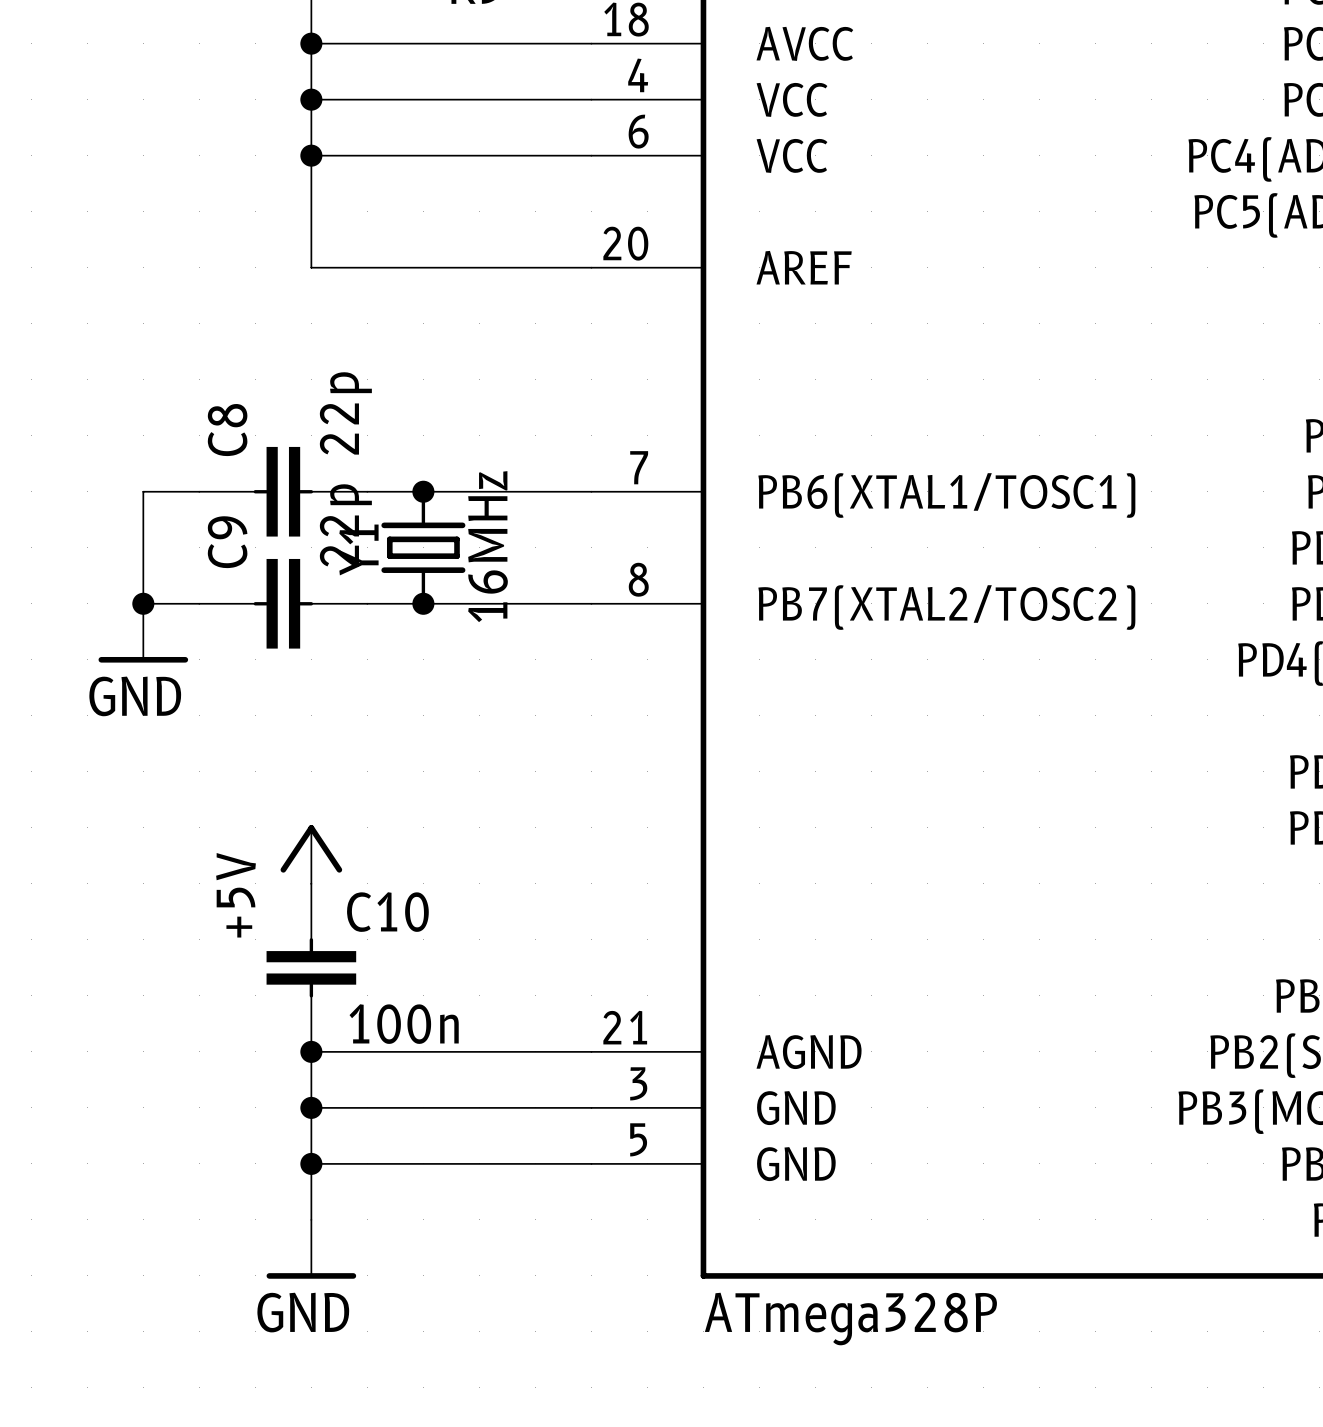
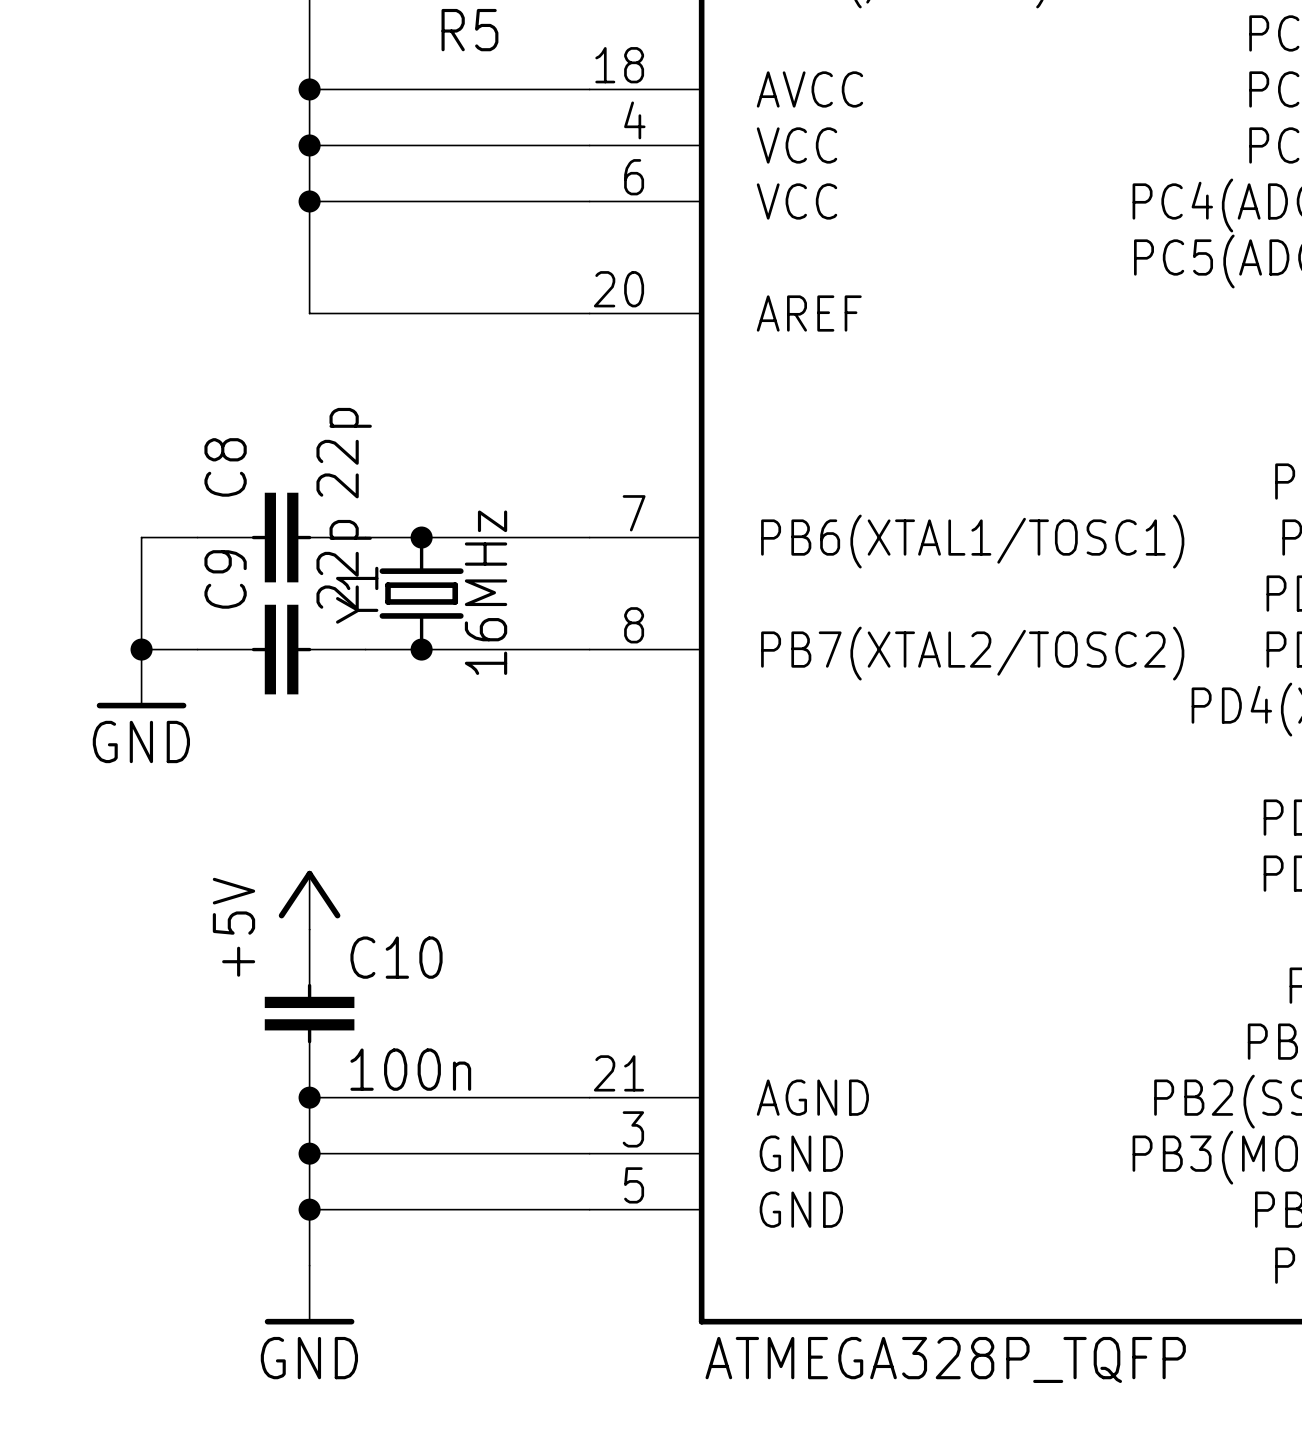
part value: ATmega328P (850, 1319) -> ATMEGA328P_TQFP (945, 1359)

